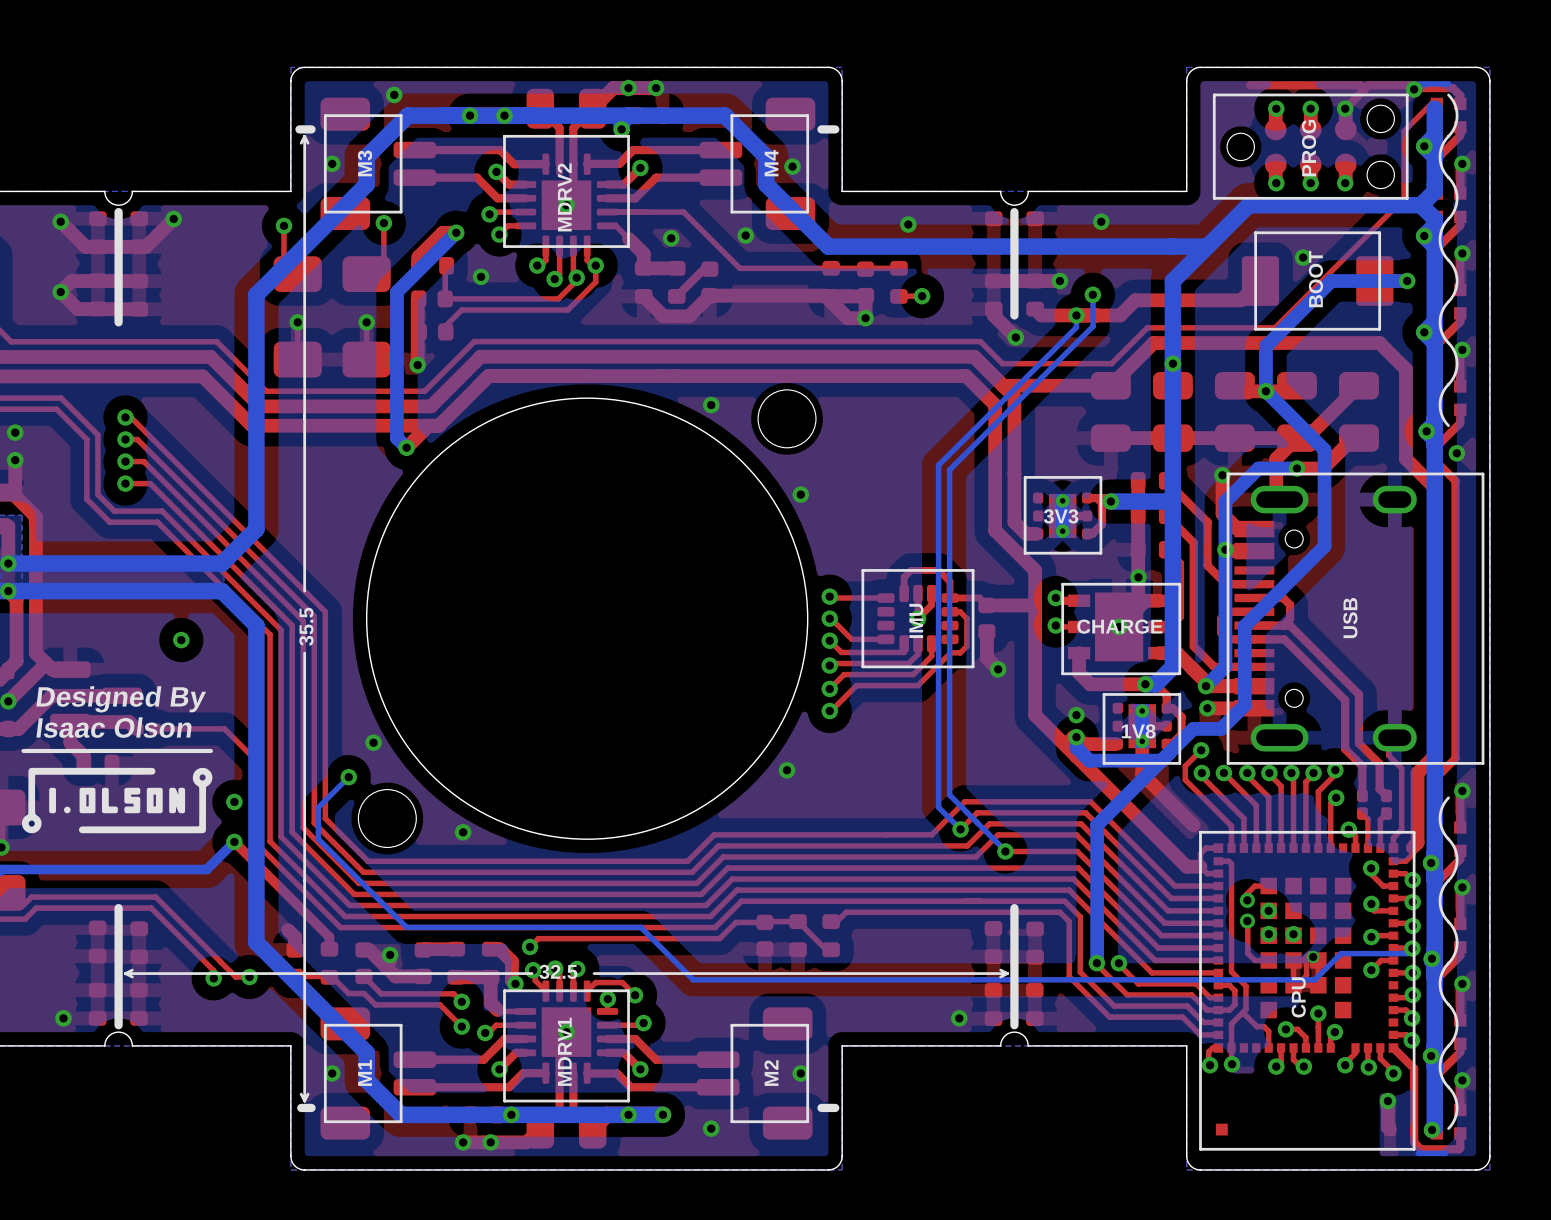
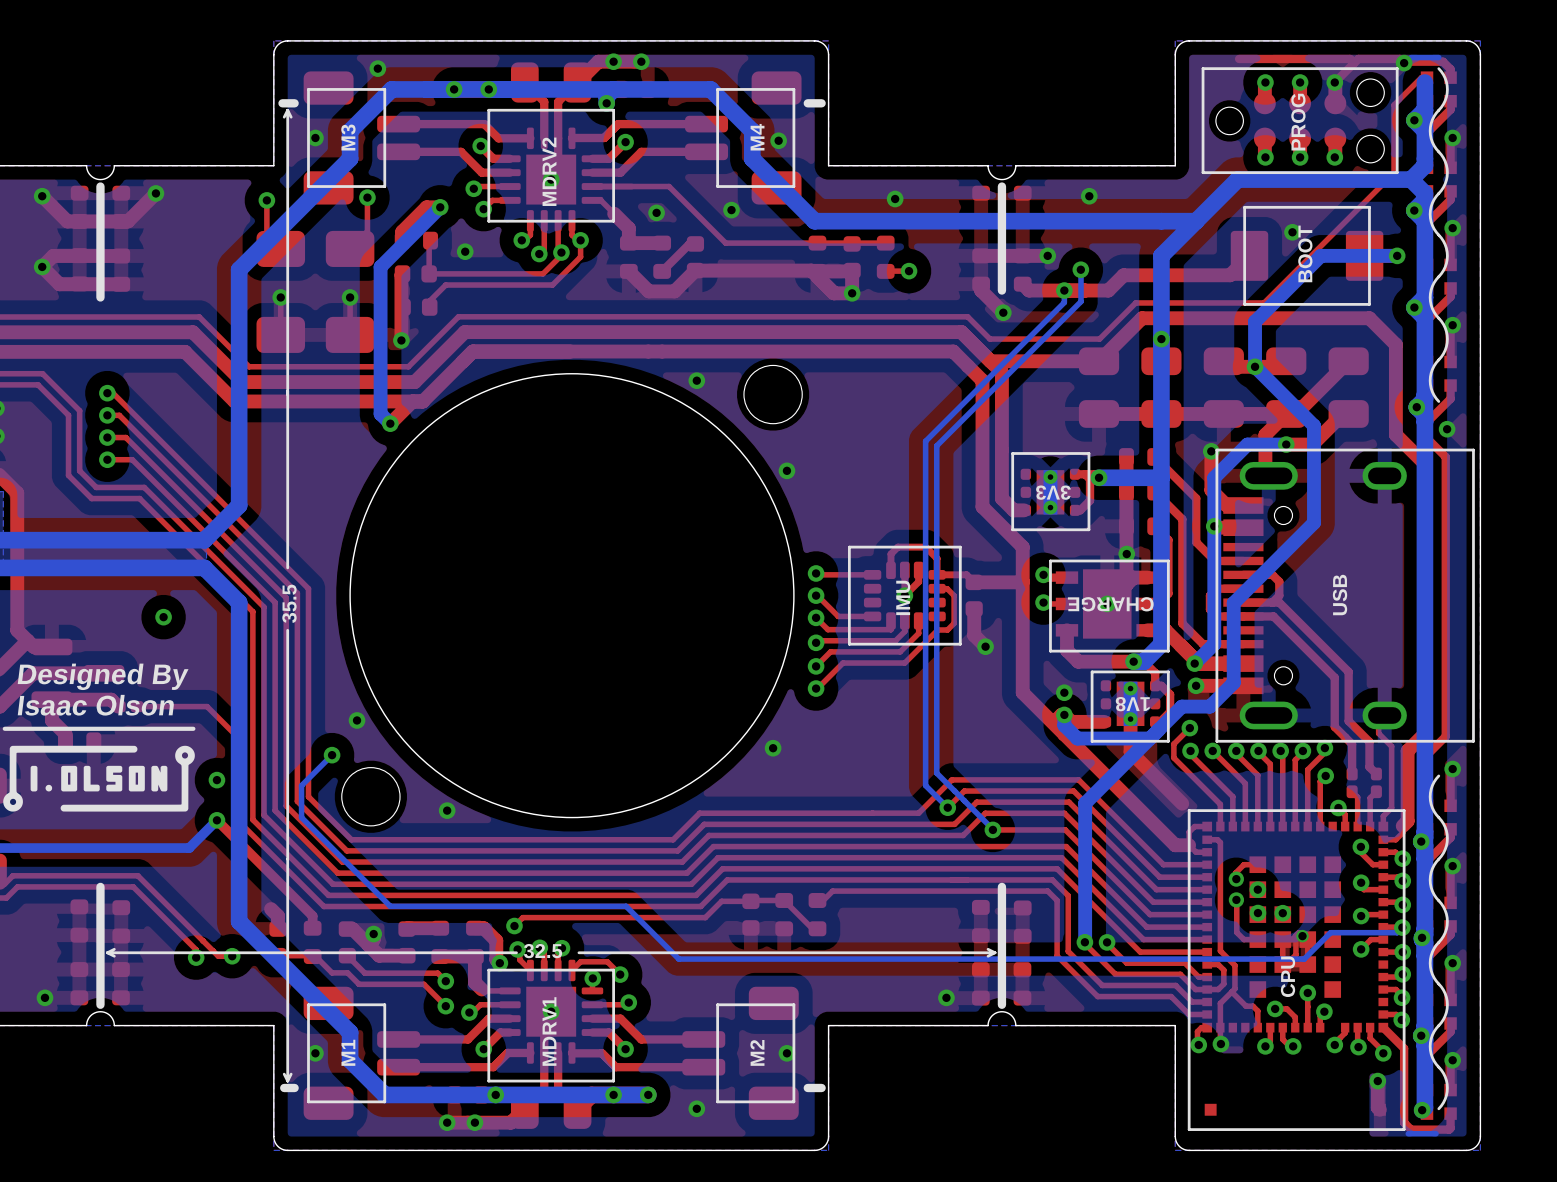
text rotation: 0° (1061, 516) -> 180° (1053, 492)
text rotation: 0° (1119, 626) -> 180° (1110, 604)
text rotation: 0° (1138, 731) -> 180° (1132, 704)

